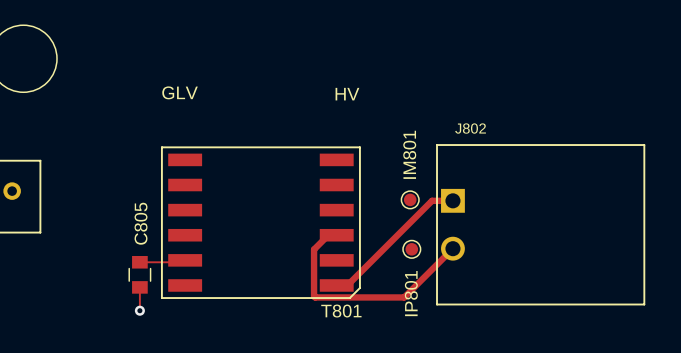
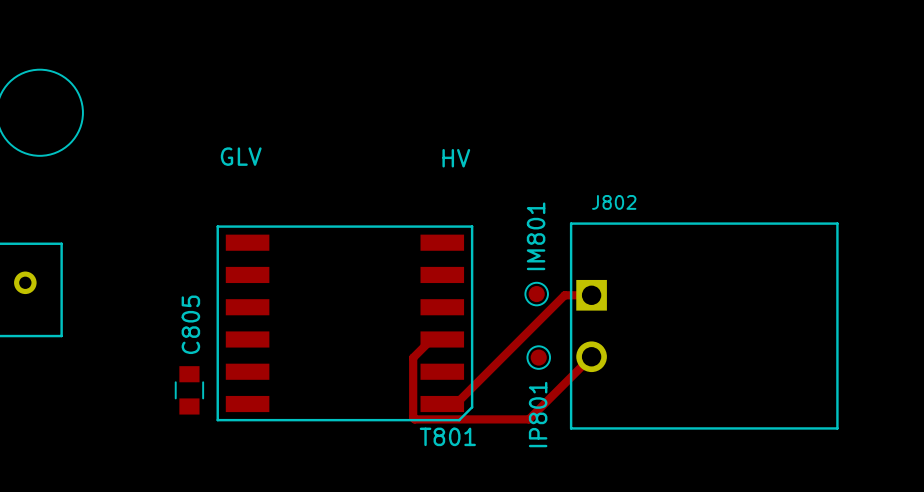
top track: (185, 260) (183, 262) (139, 262) -> none
top track: (139, 287) (139, 310) -> none
via: (139, 310) -> none

